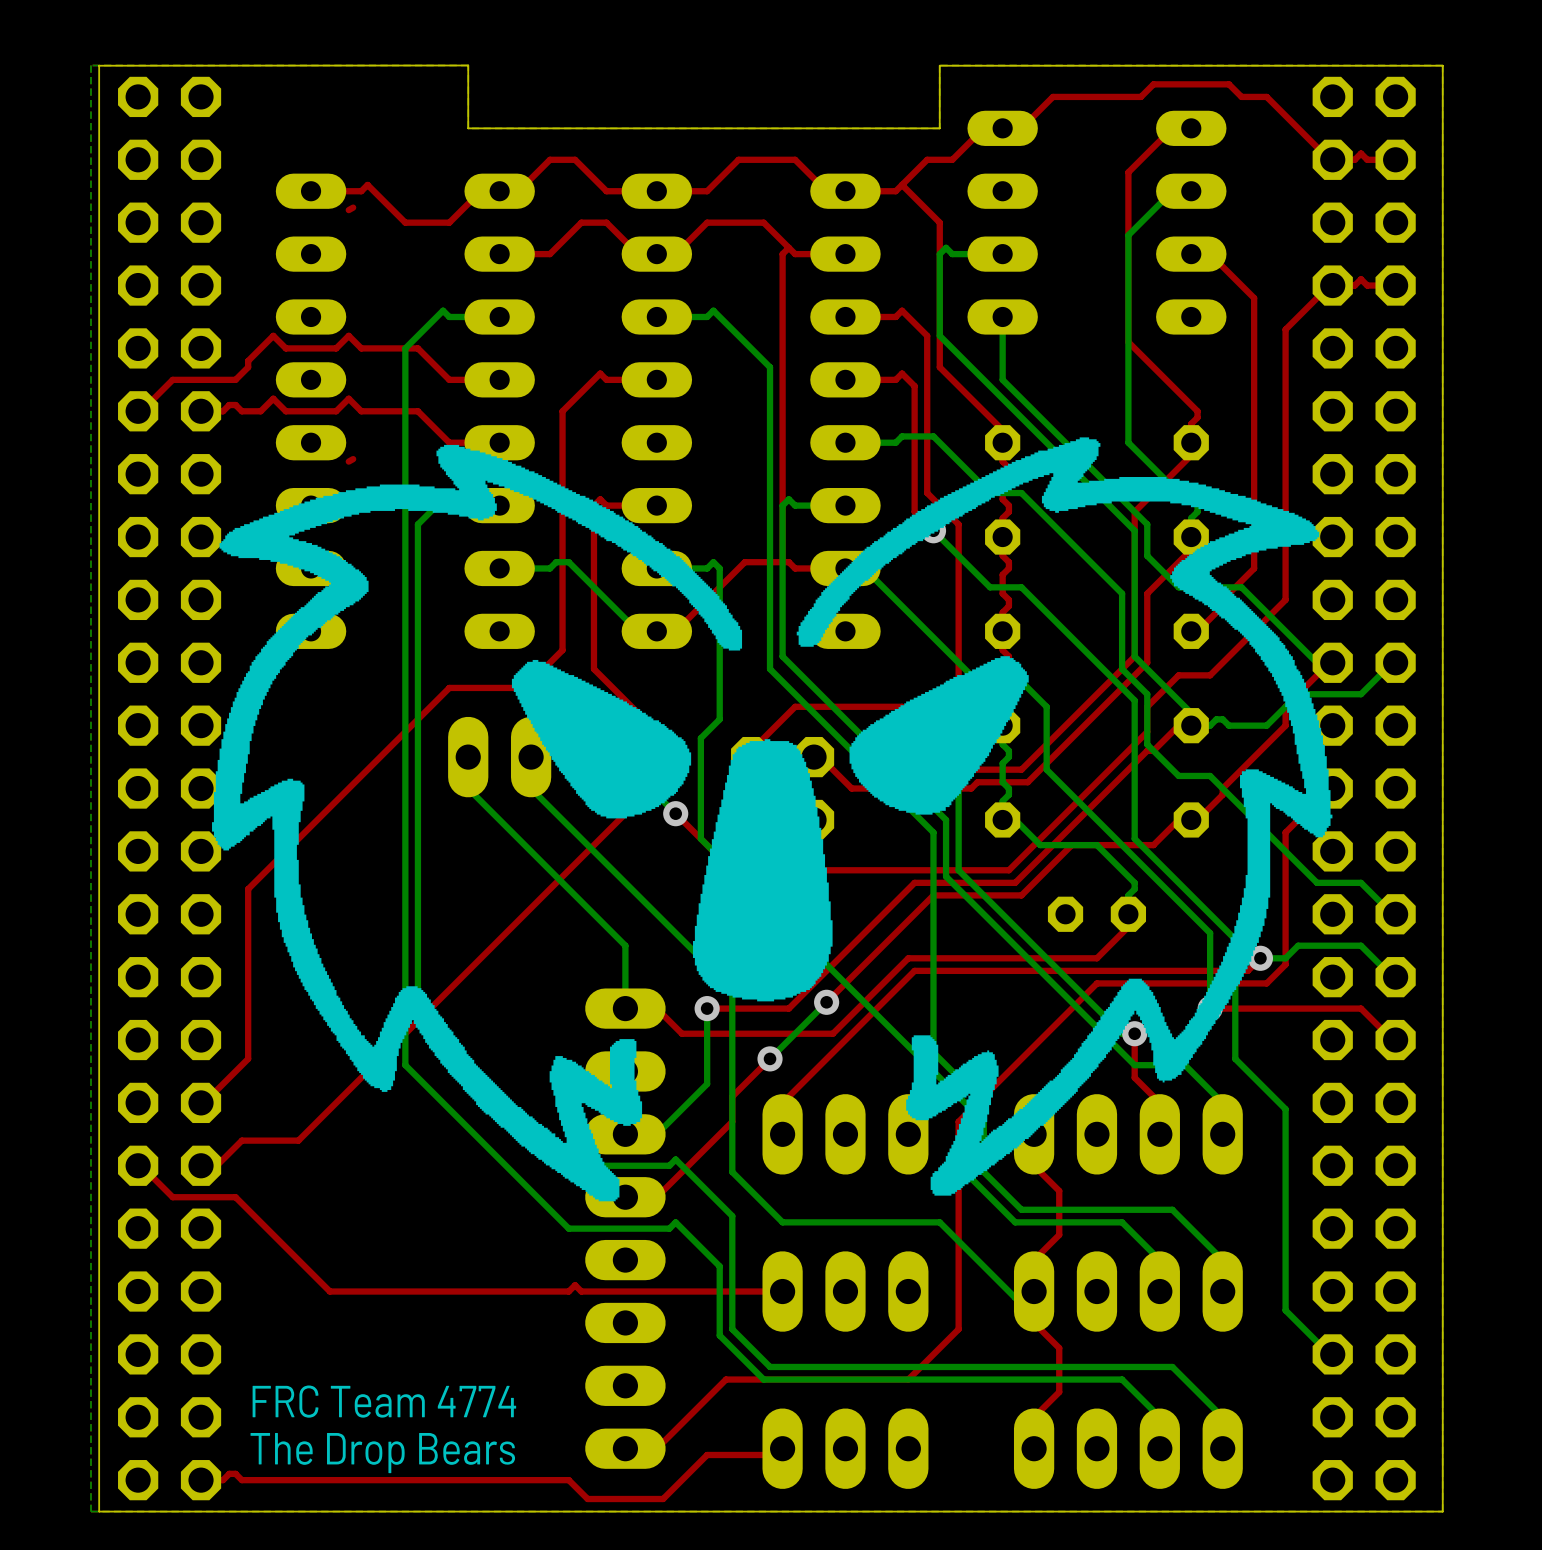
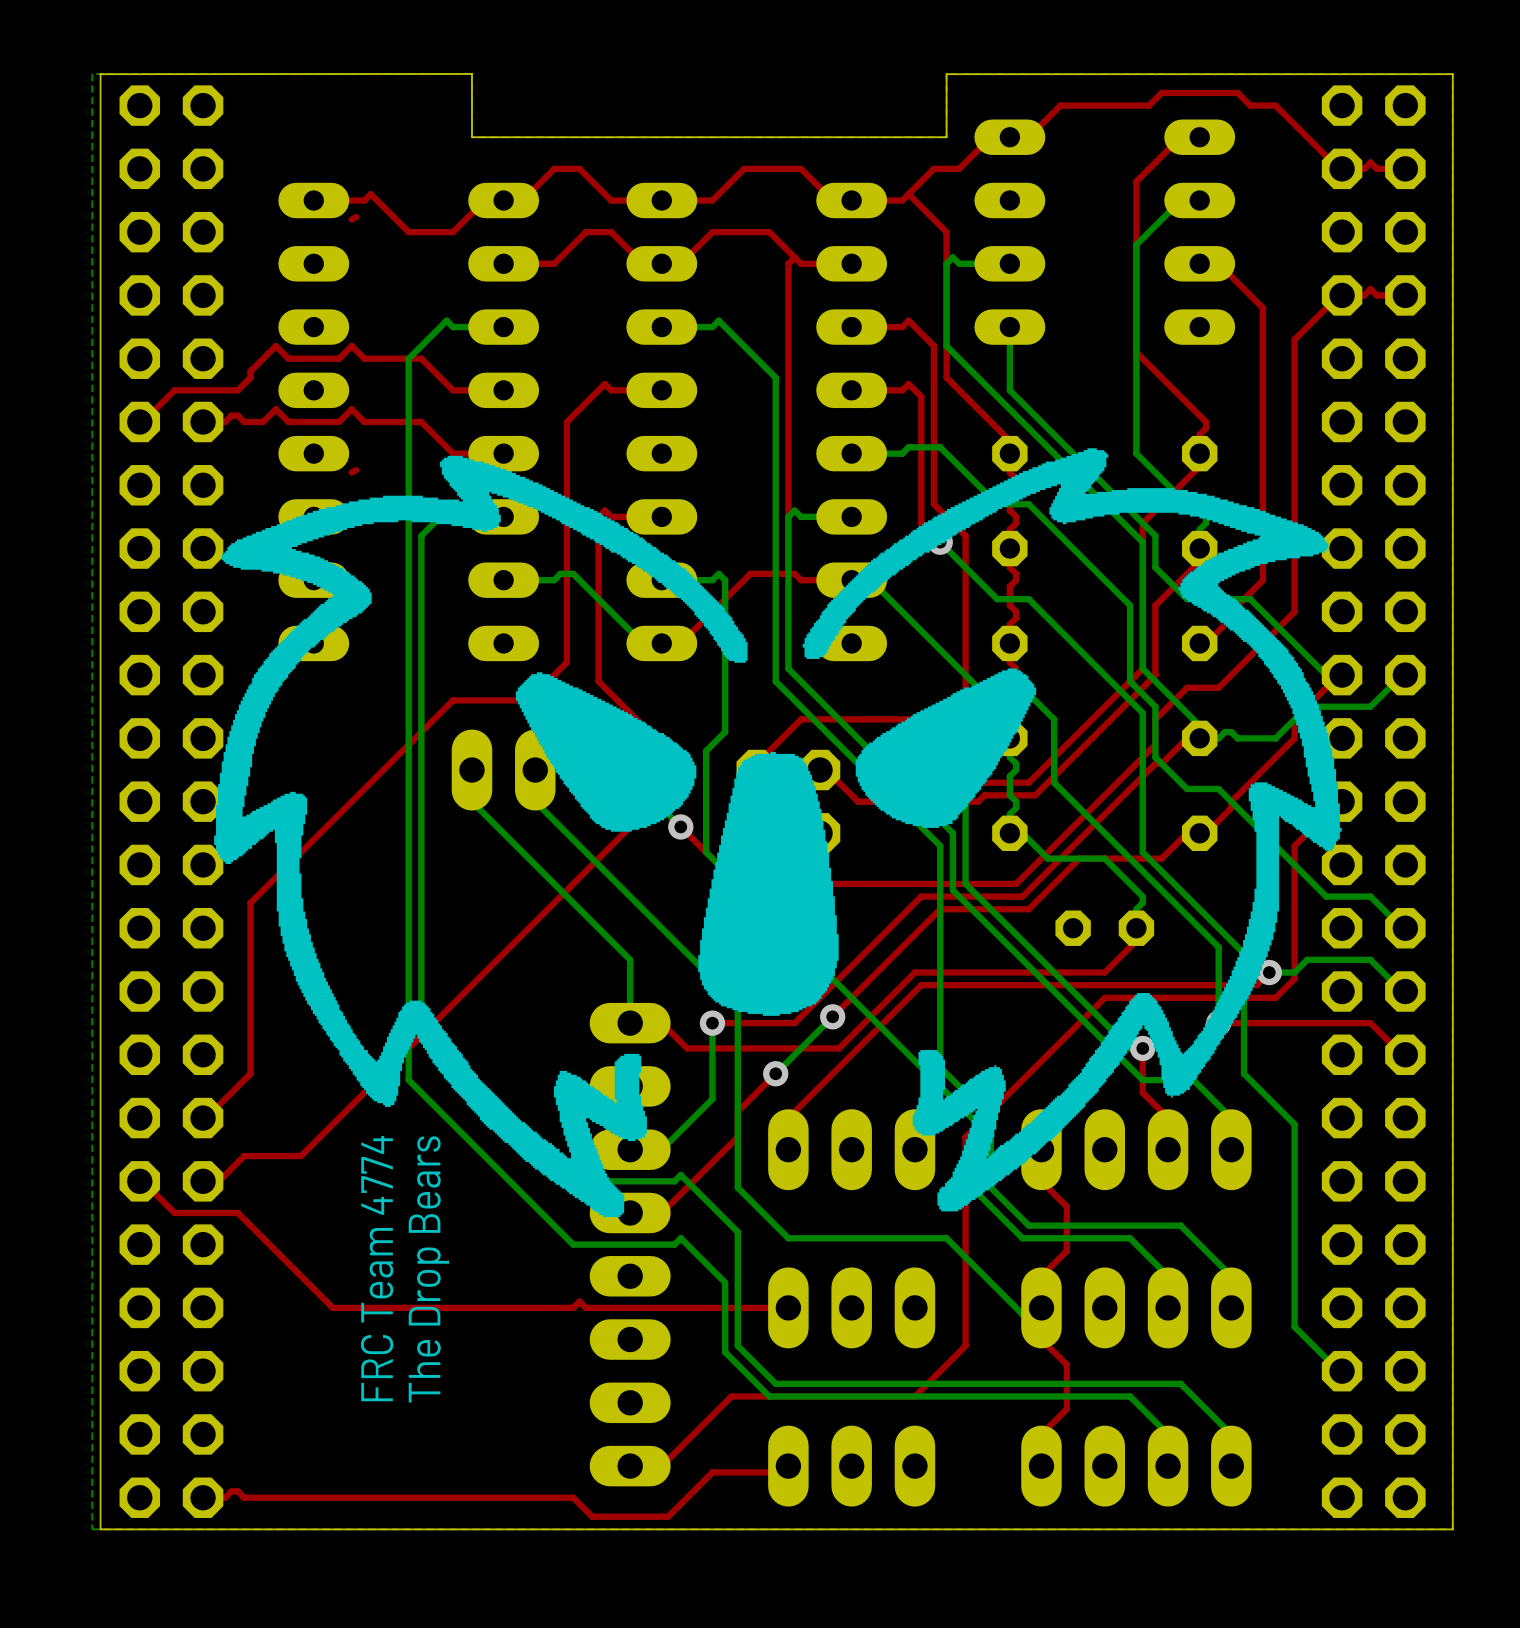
text rotation: 0° (384, 1401) -> 90° counterclockwise (377, 1268)
text rotation: 0° (382, 1453) -> 90° counterclockwise (428, 1269)

